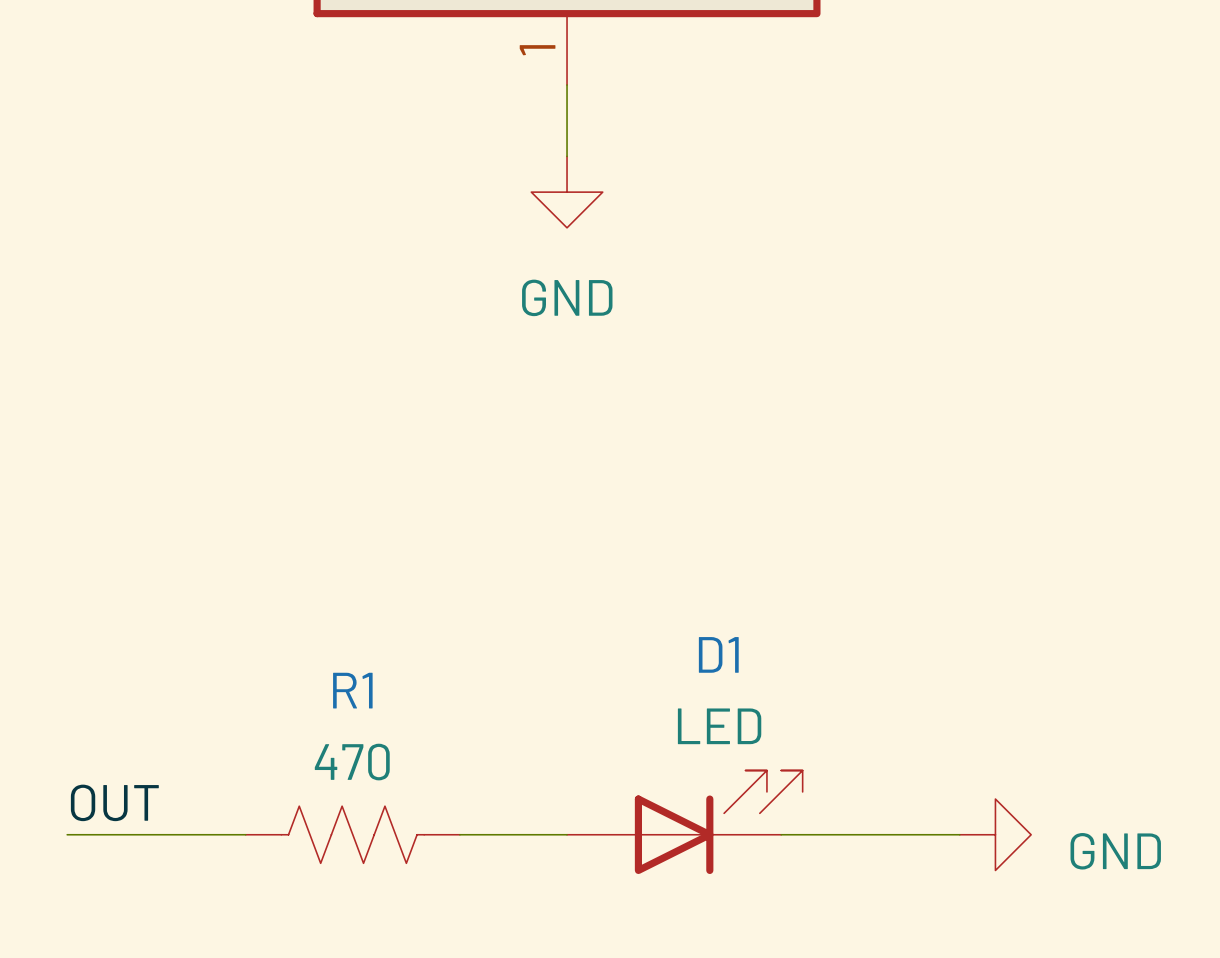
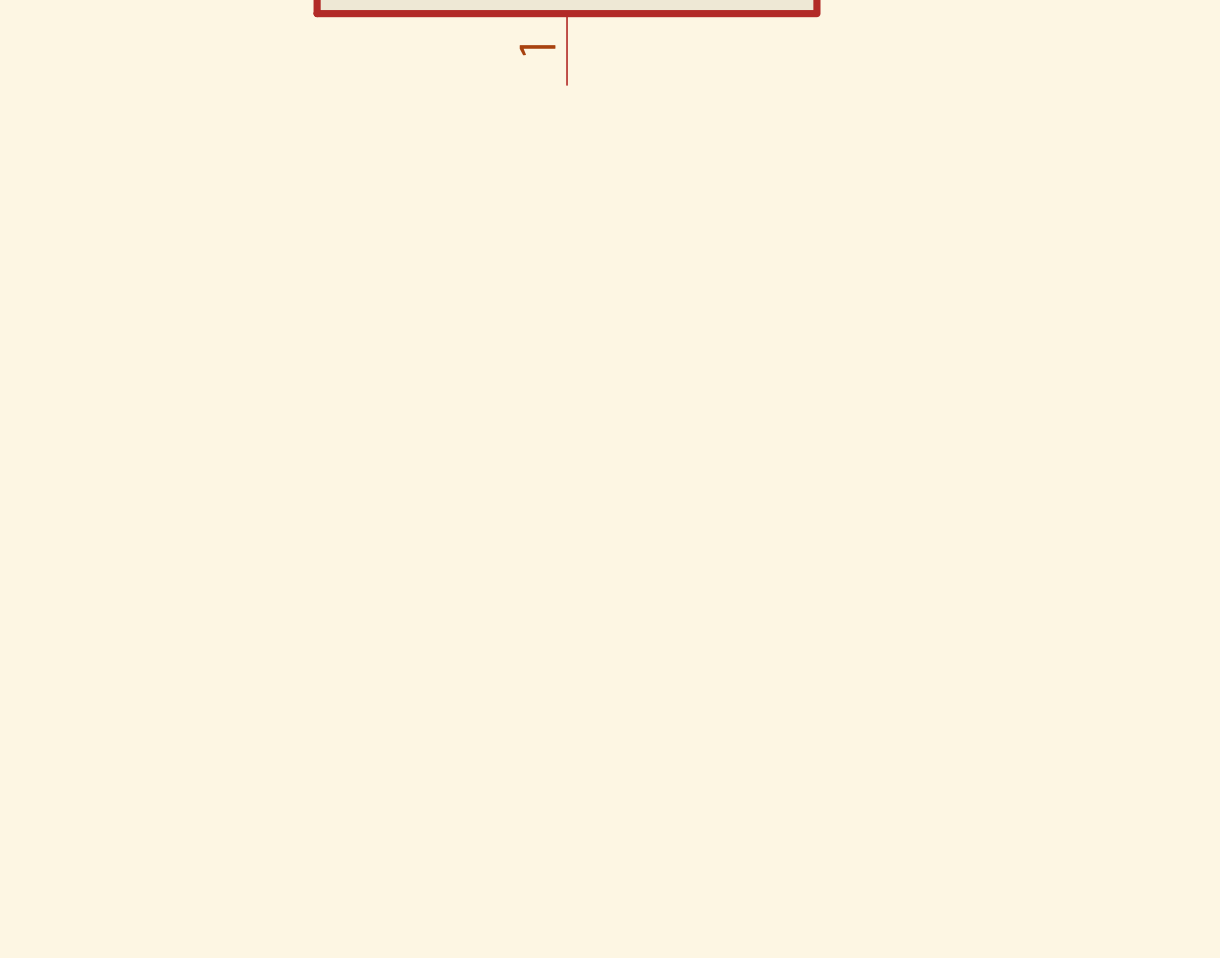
wire: (567, 85) (567, 156) -> none
power symbol: GND (567, 192) -> none
label: OUT (114, 802) -> none
D1: LED (684, 822) -> none
wire: (67, 834) (245, 834) -> none
R1: 470 (352, 834) -> none
wire: (459, 834) (567, 834) -> none
wire: (781, 834) (959, 834) -> none
power symbol: GND (995, 834) -> none

